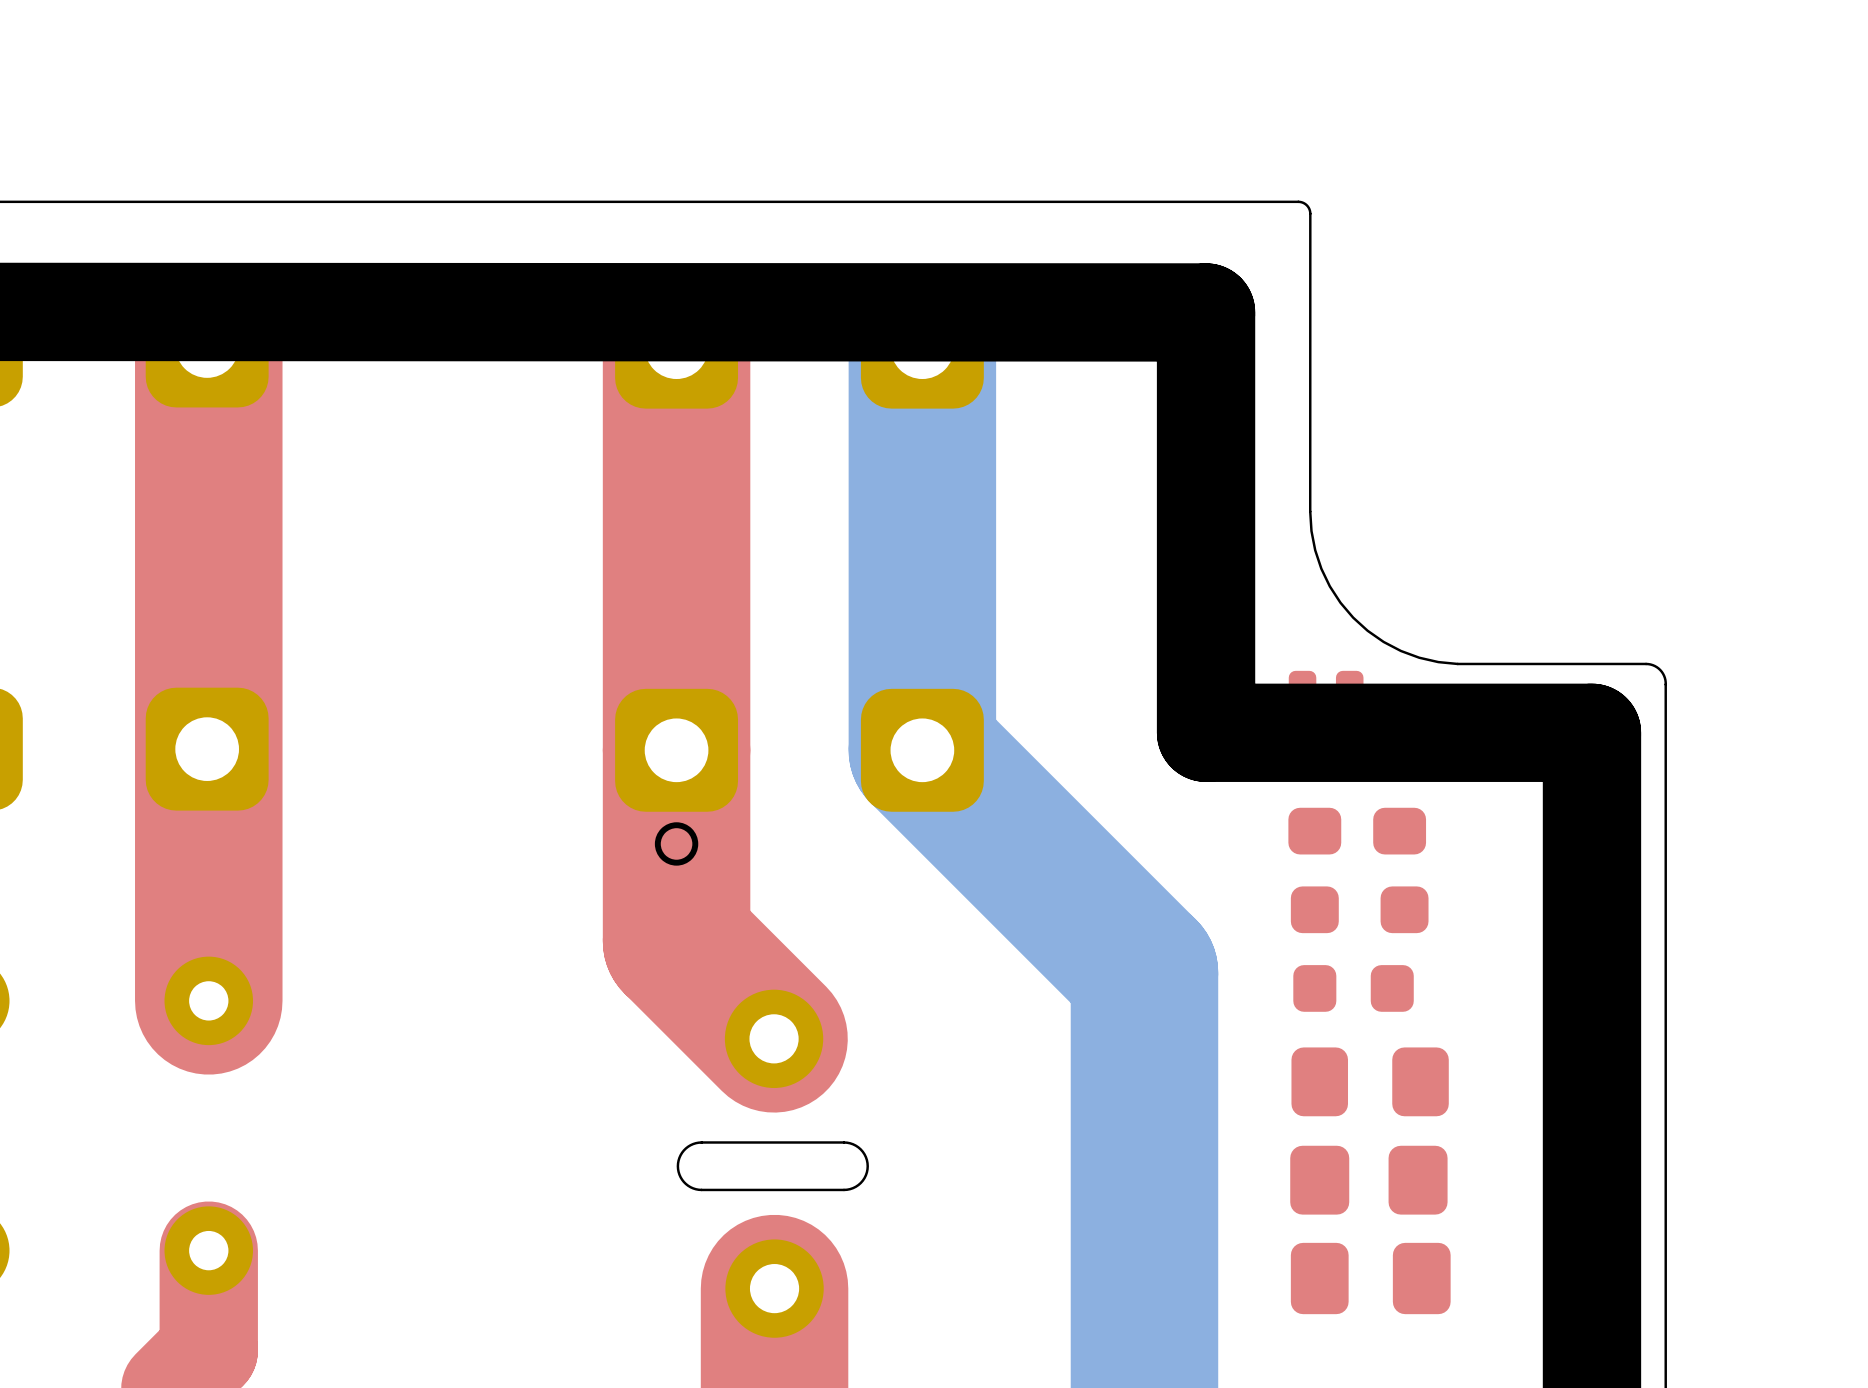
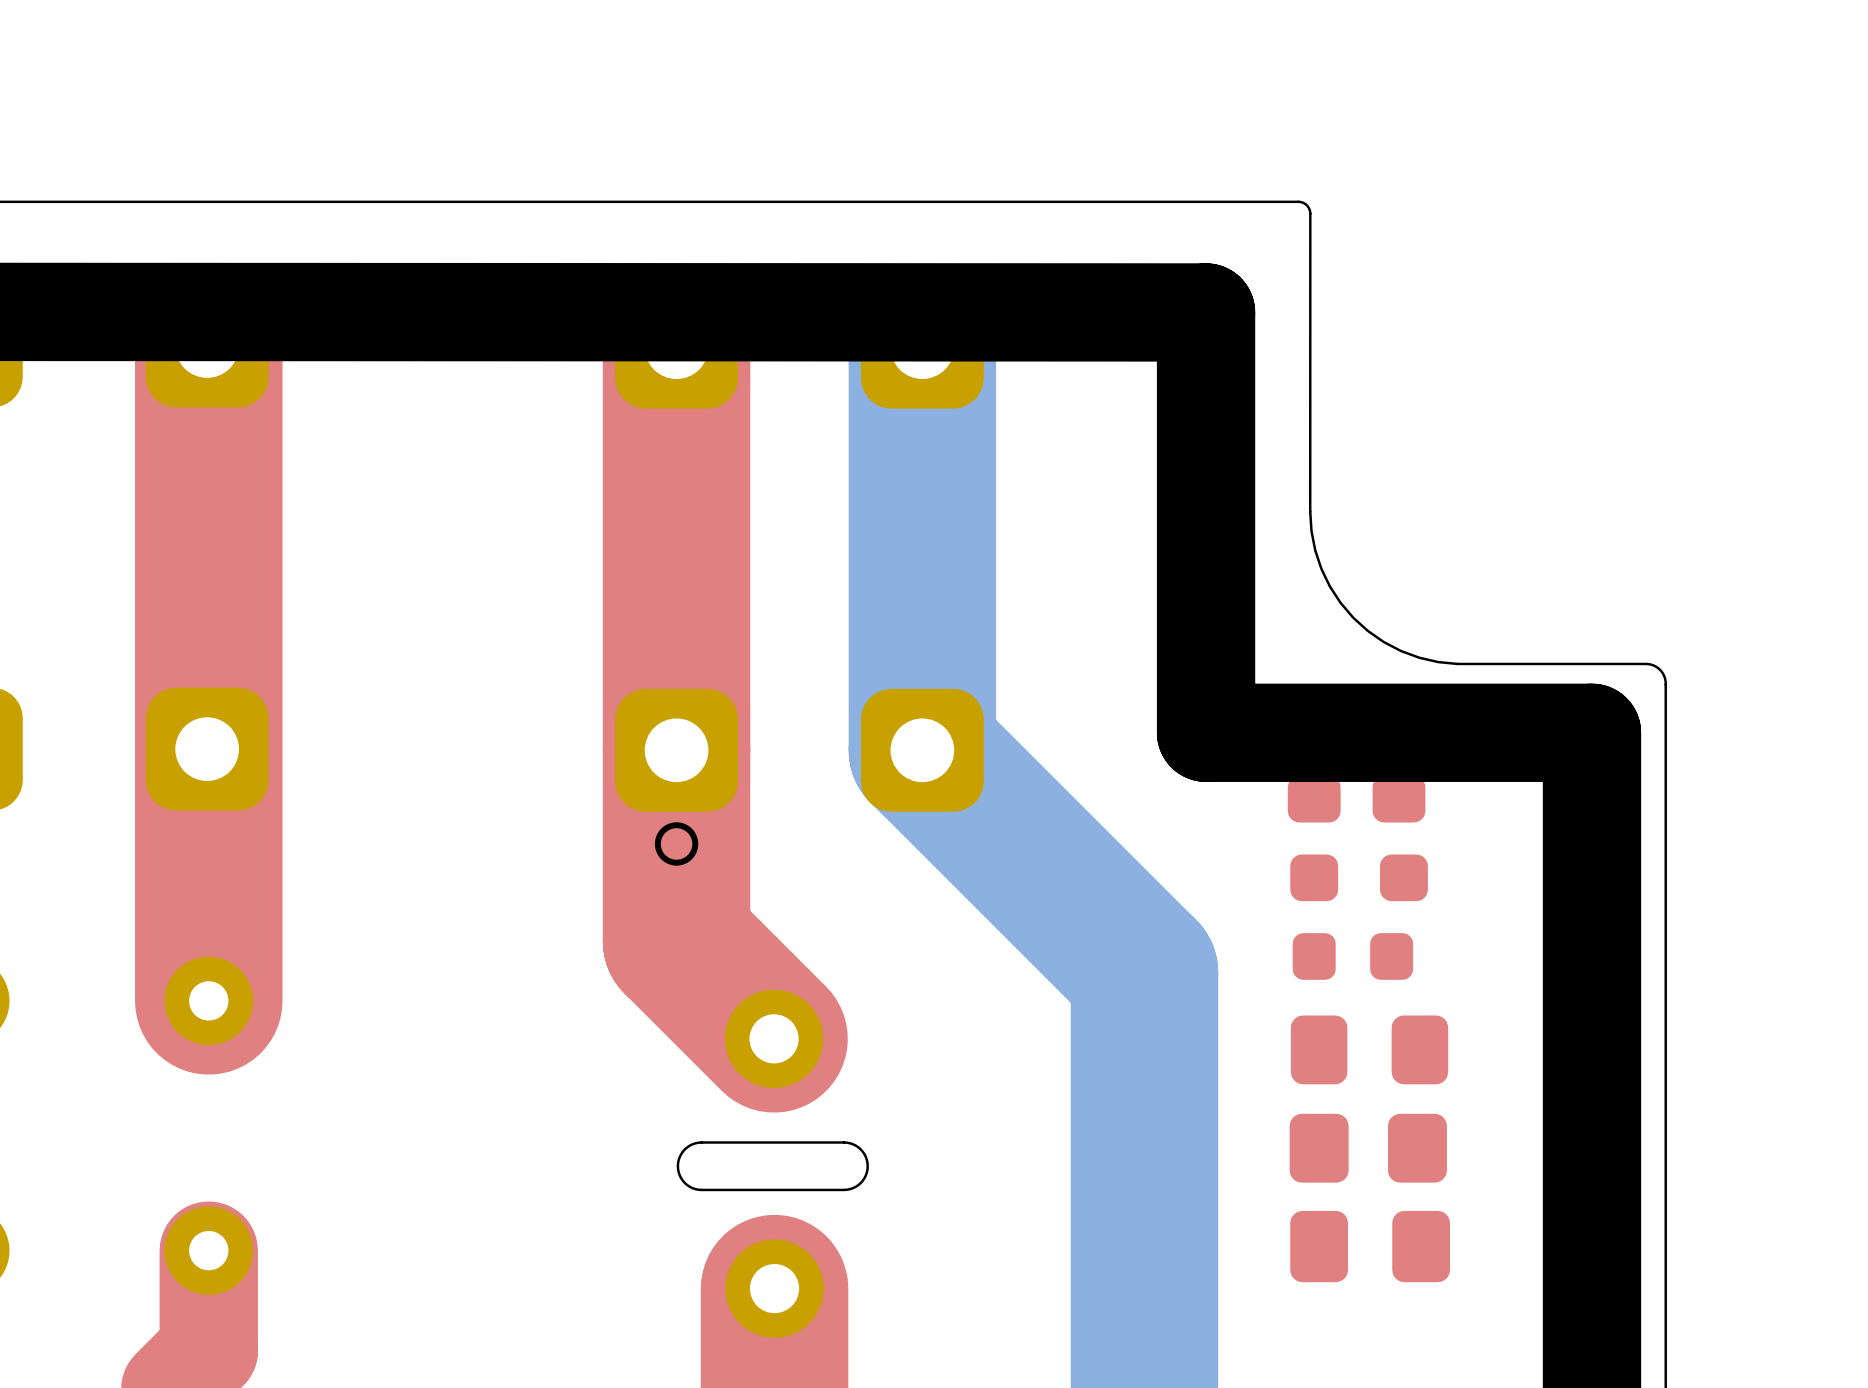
part: (1326, 686) -> none
part: none -> (1356, 799)
part: (1357, 831) -> none
part position: (1359, 909) -> (1359, 877)
part position: (1353, 988) -> (1352, 956)
part position: (1370, 1081) -> (1369, 1049)
part position: (1368, 1180) -> (1368, 1148)
part position: (1370, 1278) -> (1370, 1246)

